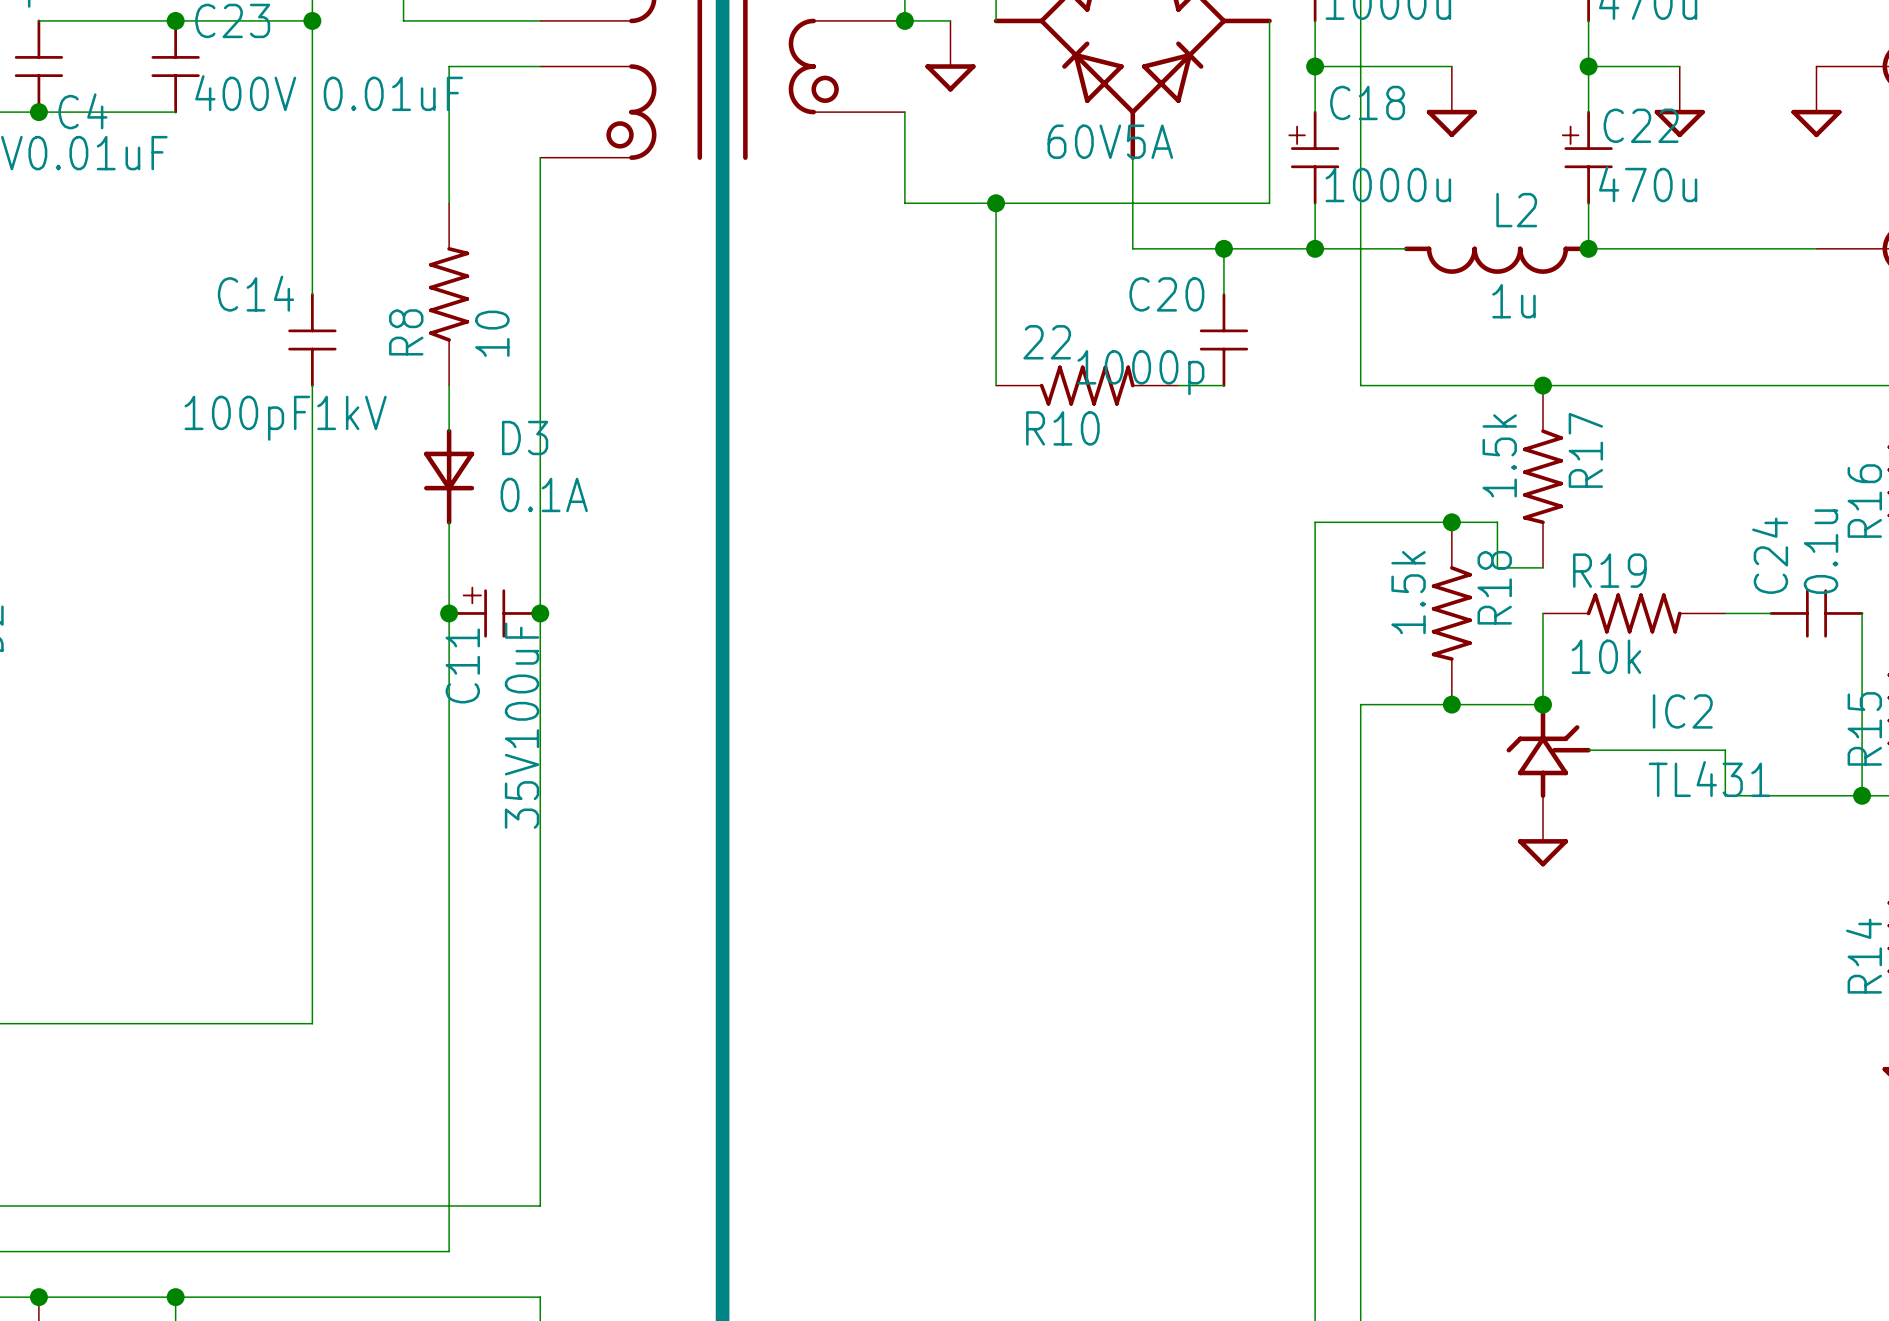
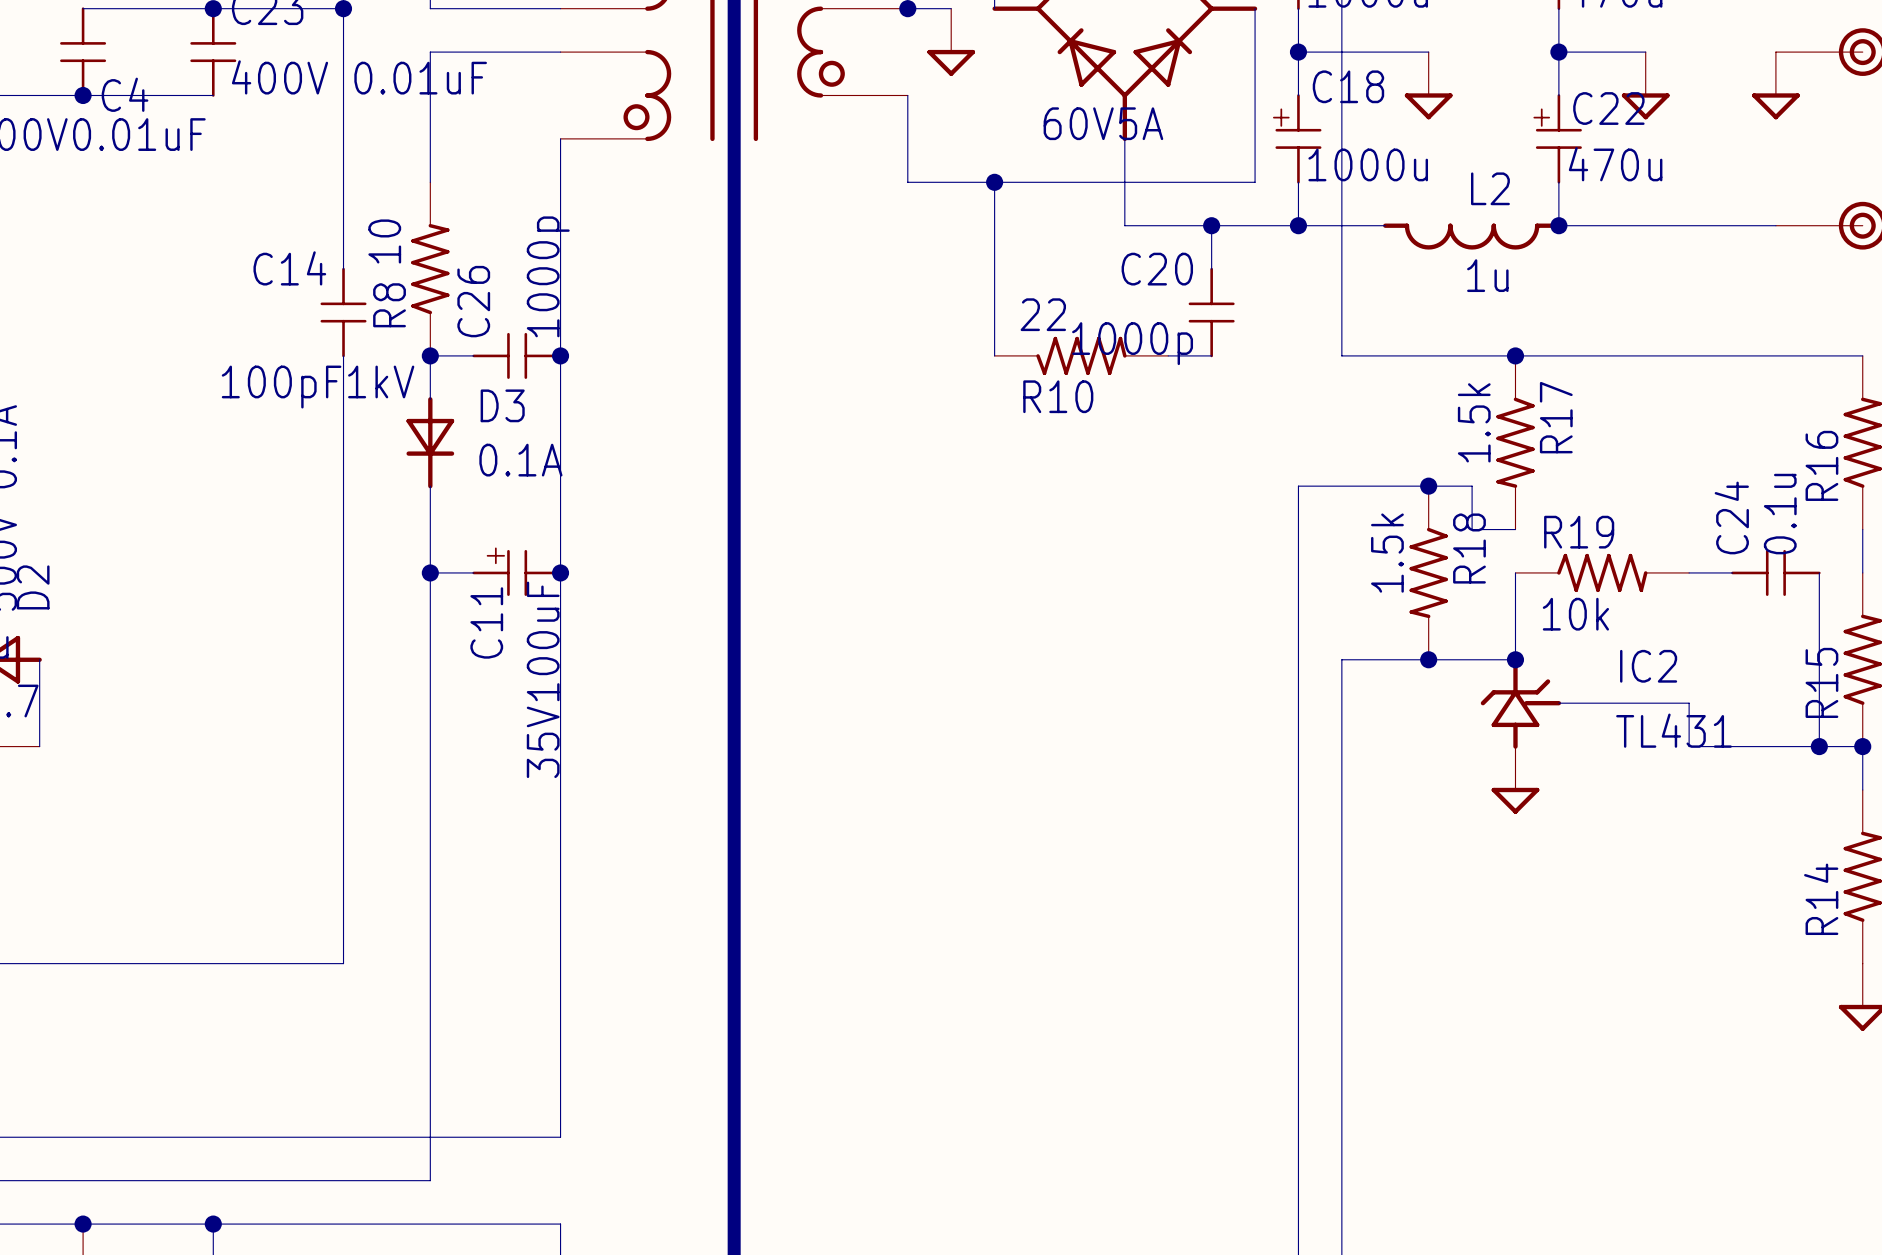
wire: (449, 66) (449, 203) -> (473, 52) (430, 52) (430, 182)
R8 position: (449, 294) -> (430, 269)
R8 value position: 10 (492, 333) -> 10 (384, 241)
junction: none -> (430, 355)
wire: (449, 385) (449, 431) -> (473, 355) (430, 355) (430, 399)
C26: none -> 1000p (517, 355)
junction: none -> (560, 355)
D3 position: (449, 476) -> (430, 442)
wire: (449, 522) (449, 1251) (403, 1251) -> (430, 486) (430, 1180)
wire: none -> (430, 572) (473, 572)
junction position: (449, 613) -> (430, 572)

